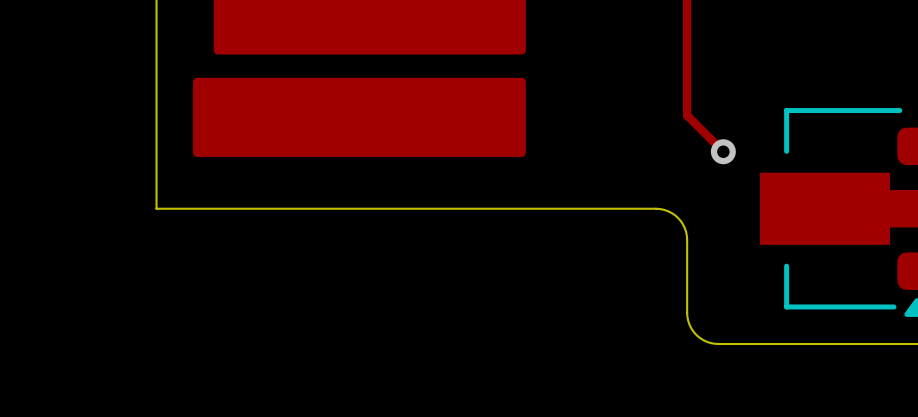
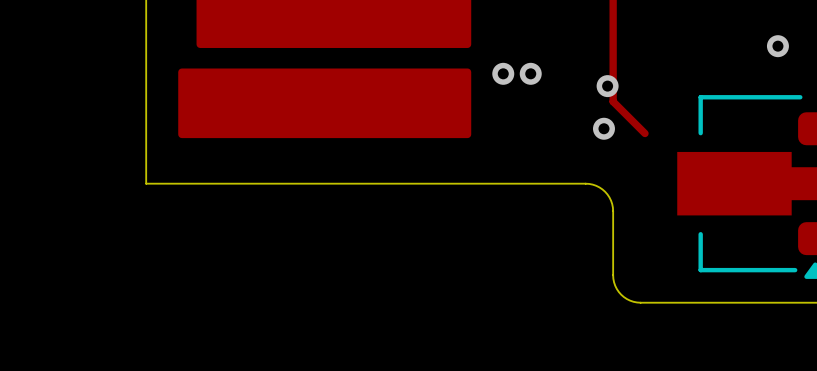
via: none -> (777, 46)
via: none -> (503, 73)
via: none -> (530, 73)
via: none -> (607, 86)
via: none -> (603, 128)
via: (723, 151) -> none

